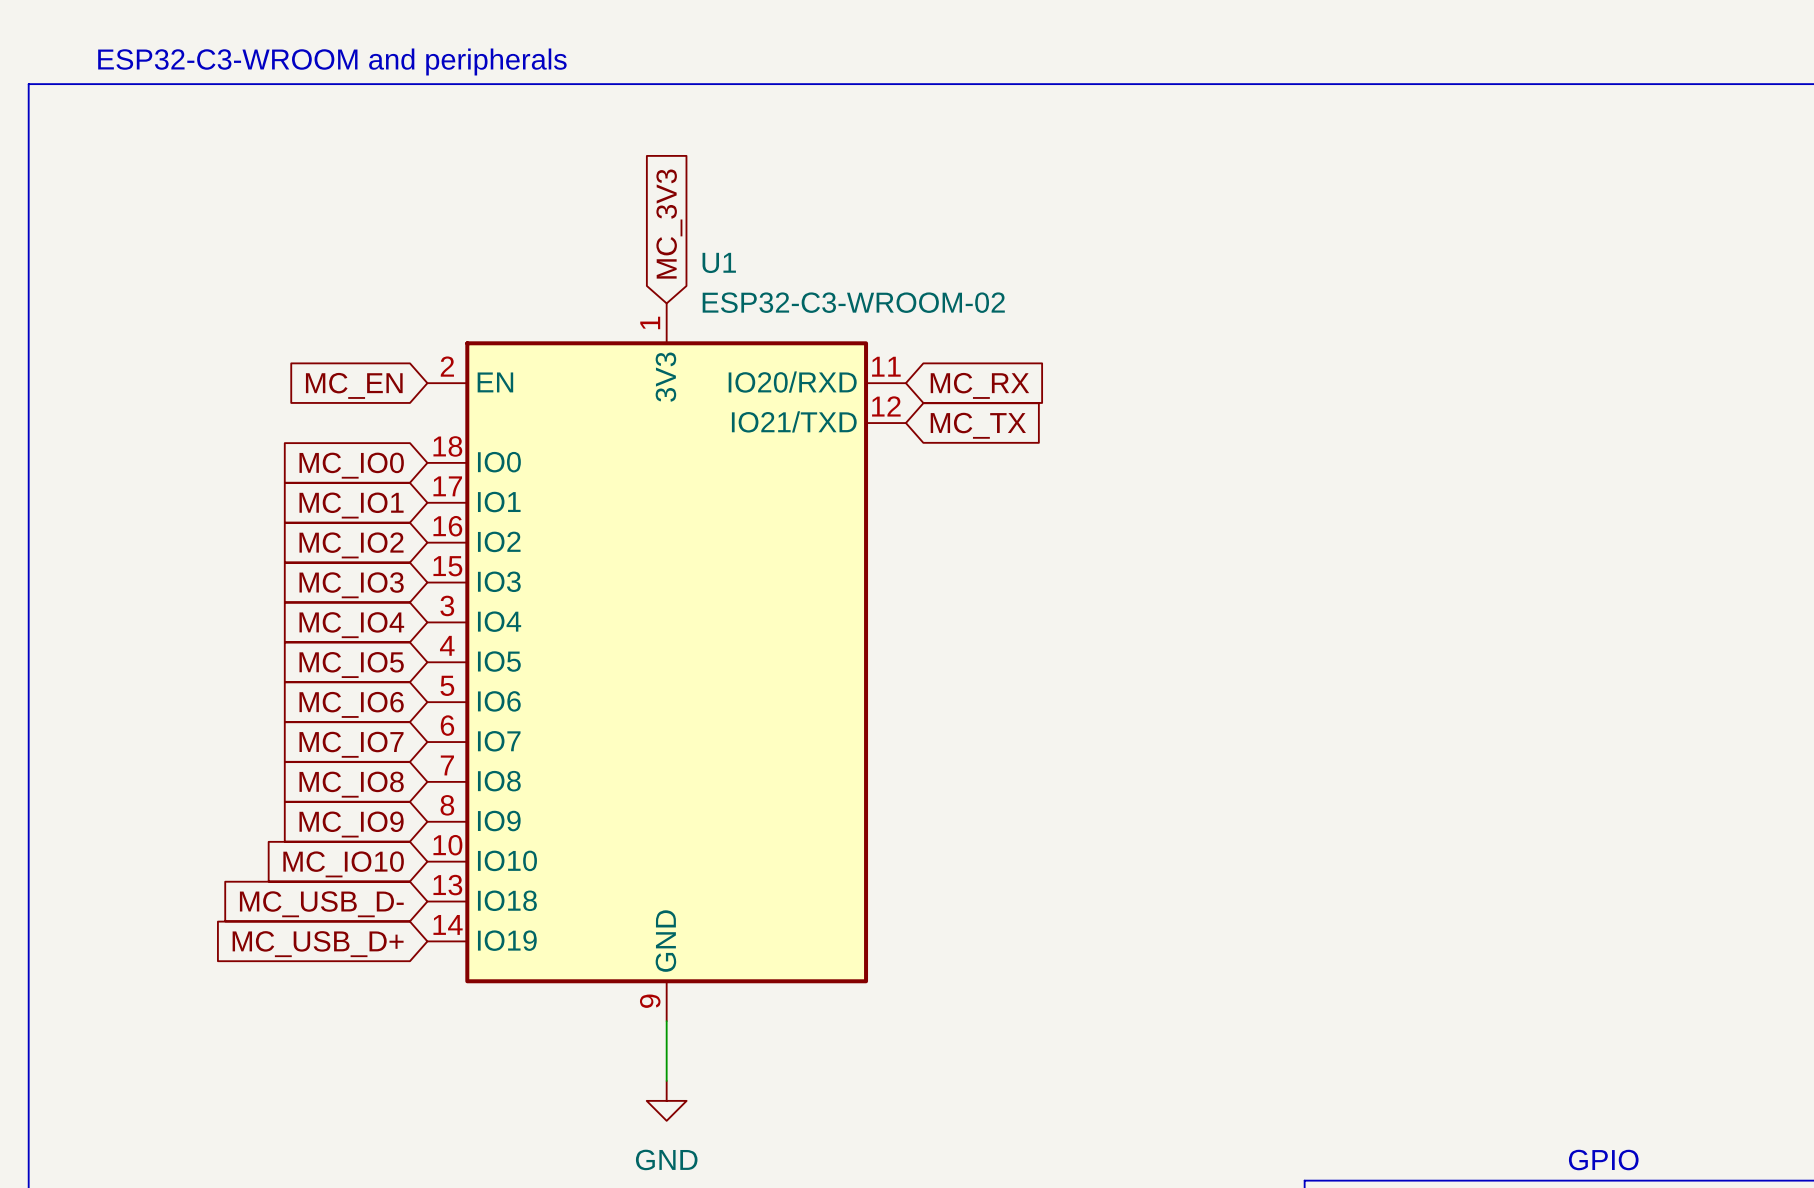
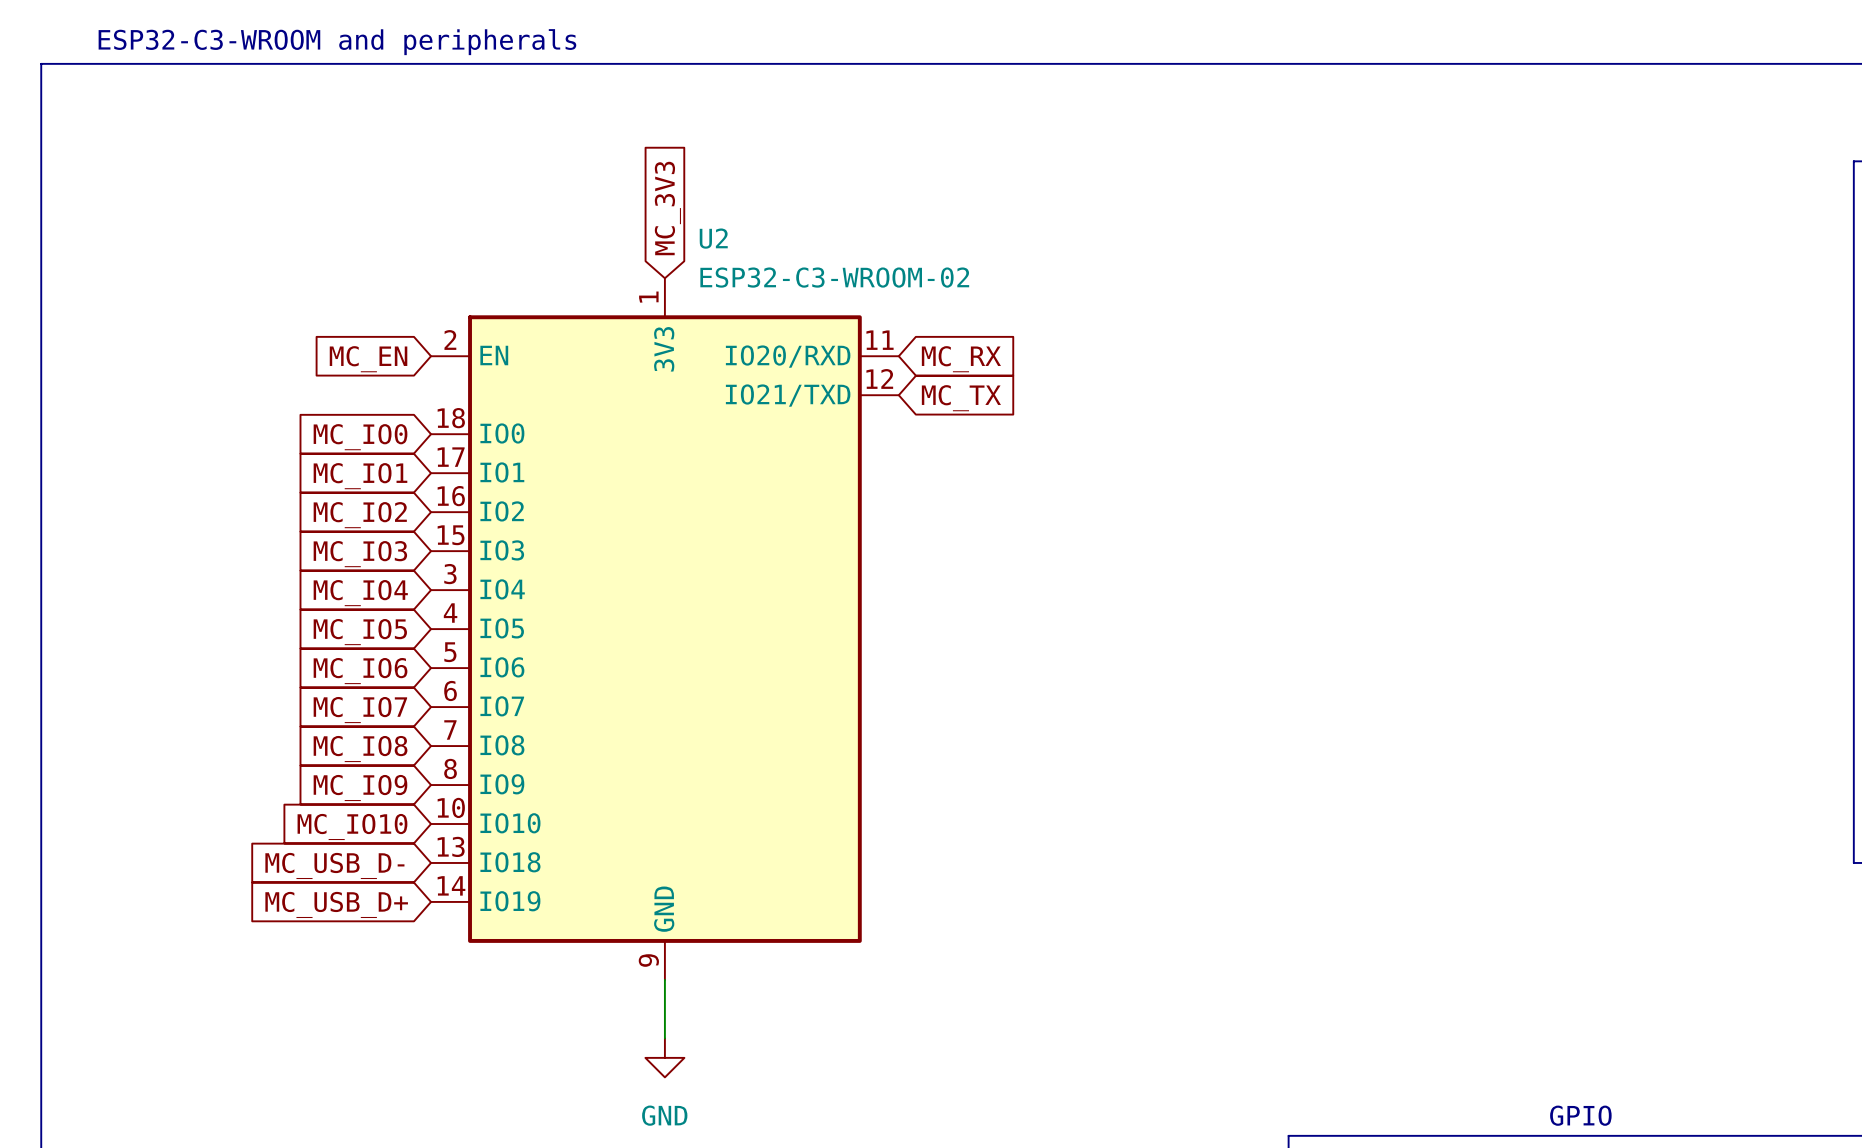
U1 name: U1 (719, 262) -> U2 (713, 238)

